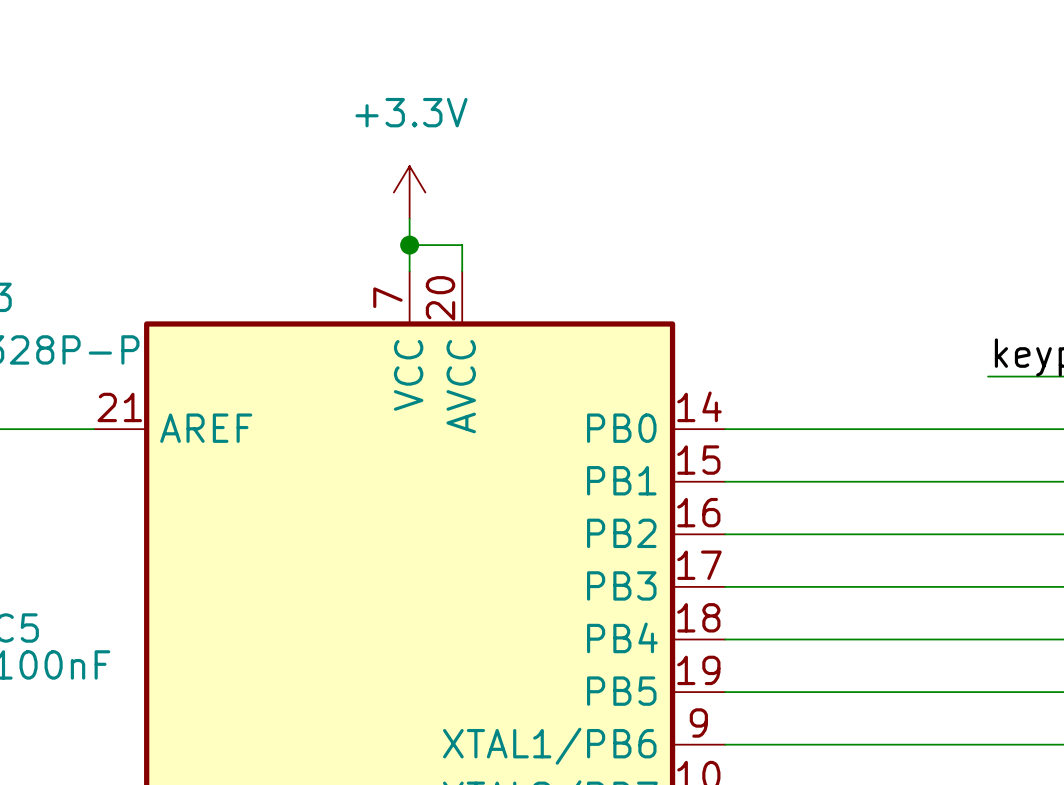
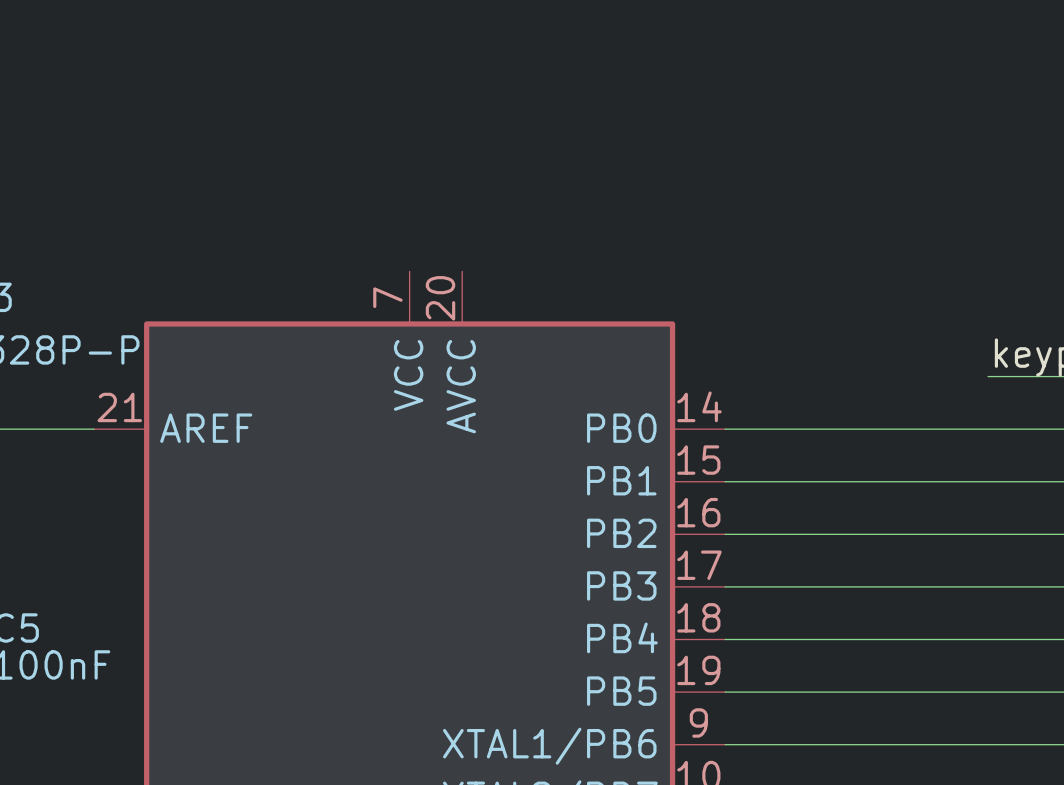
power symbol: +3.3V (409, 192) -> none
wire: (409, 218) (409, 271) -> none
wire: (409, 245) (462, 245) (462, 271) -> none
junction: (409, 245) -> none

